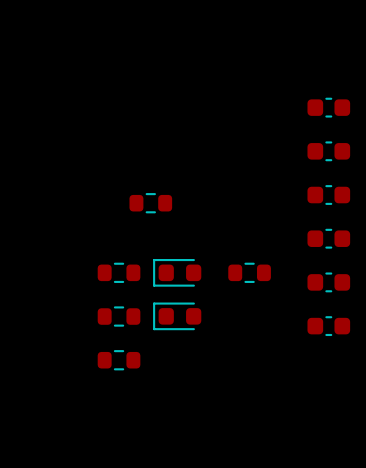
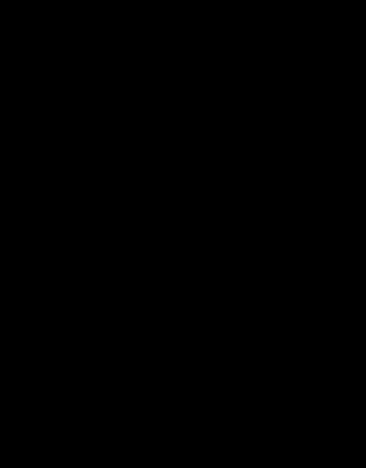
part: (328, 107) -> none
part: (328, 151) -> none
part: (328, 195) -> none
part: (150, 203) -> none
part: (328, 238) -> none
part: (119, 272) -> none
part: (177, 272) -> none
part: (249, 272) -> none
part: (328, 282) -> none
part: (119, 316) -> none
part: (177, 316) -> none
part: (328, 326) -> none
part: (119, 360) -> none

